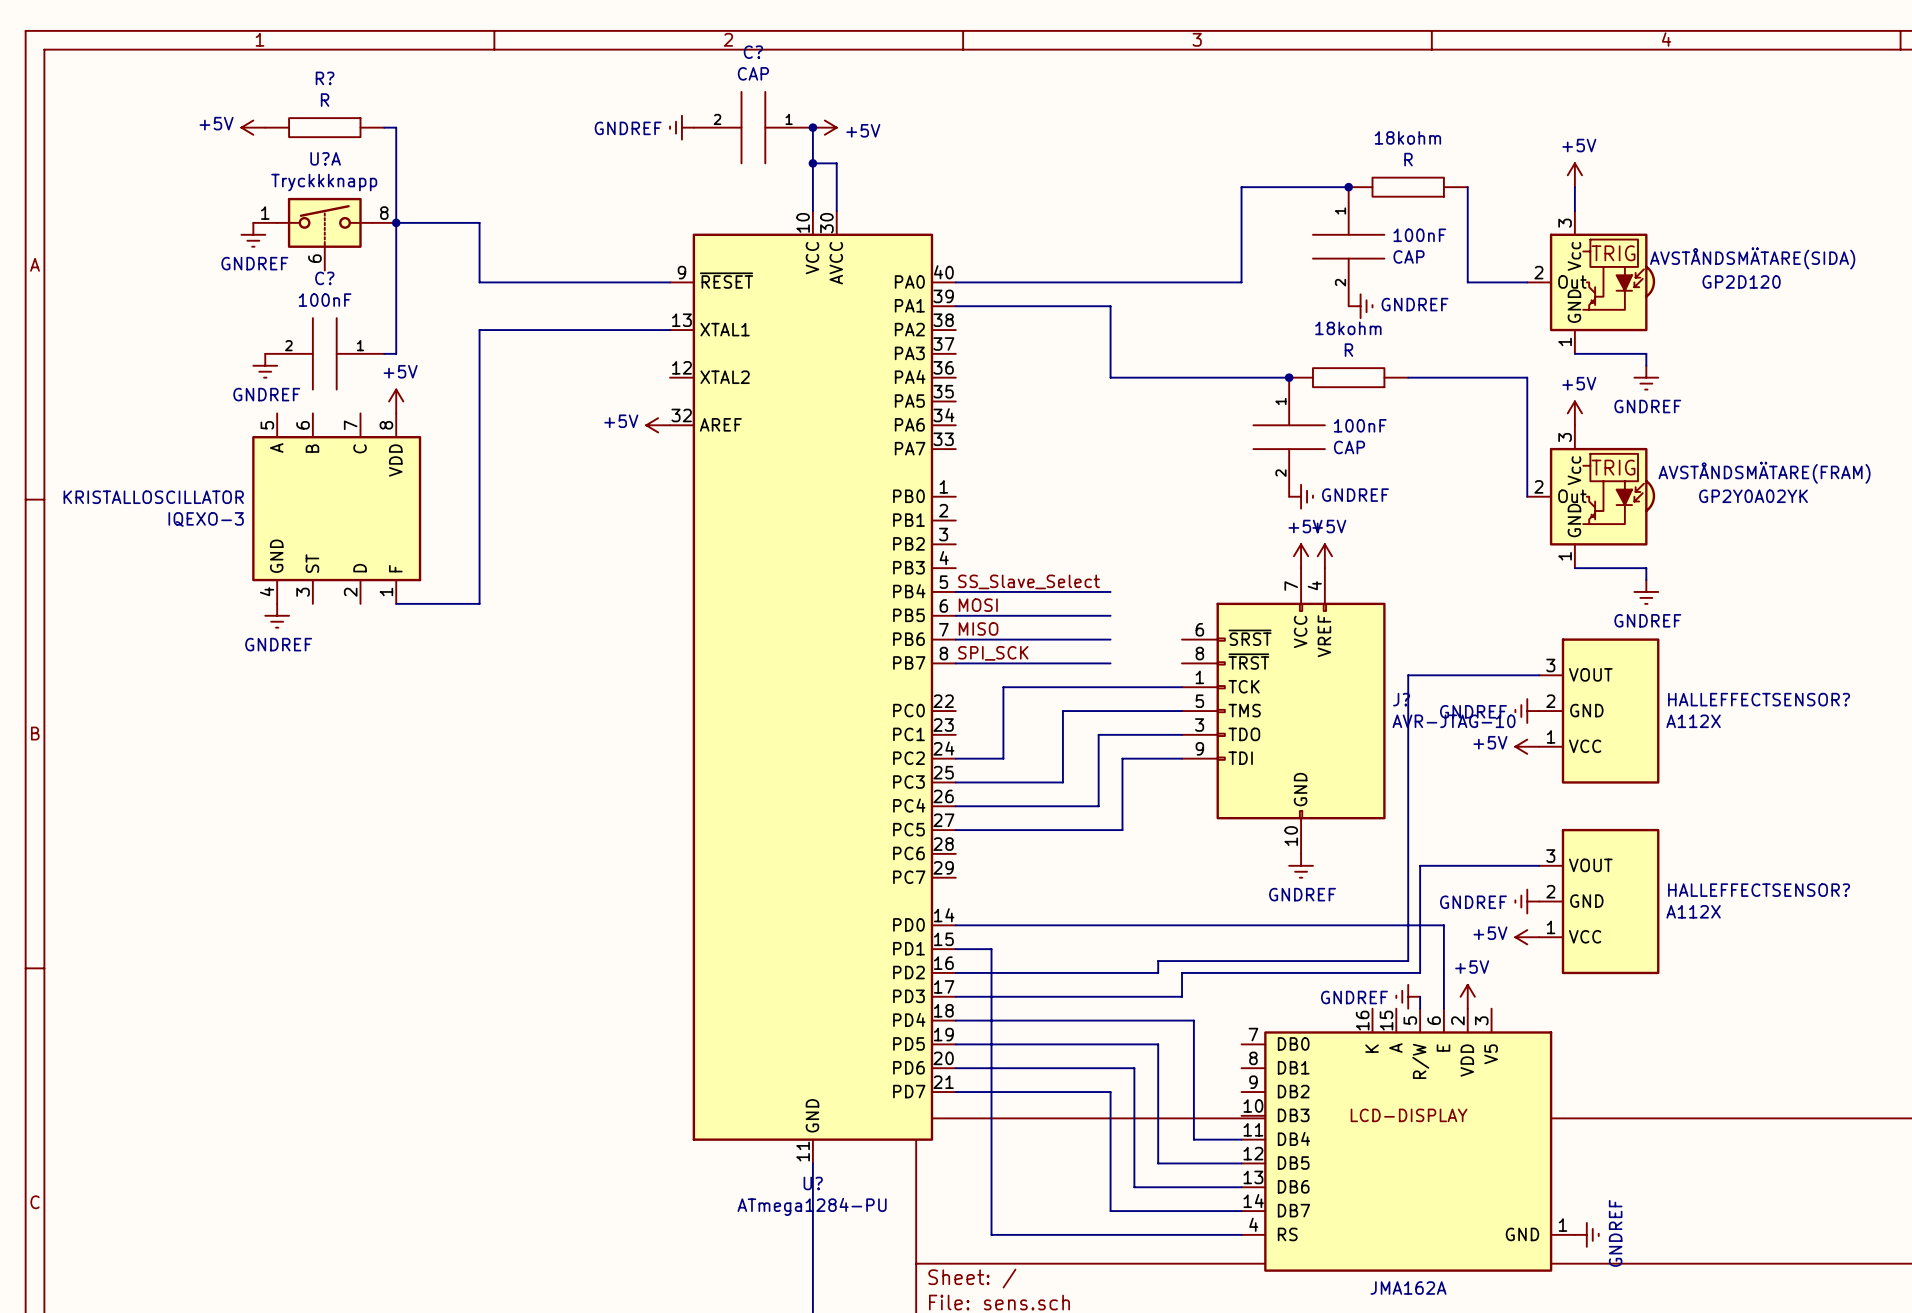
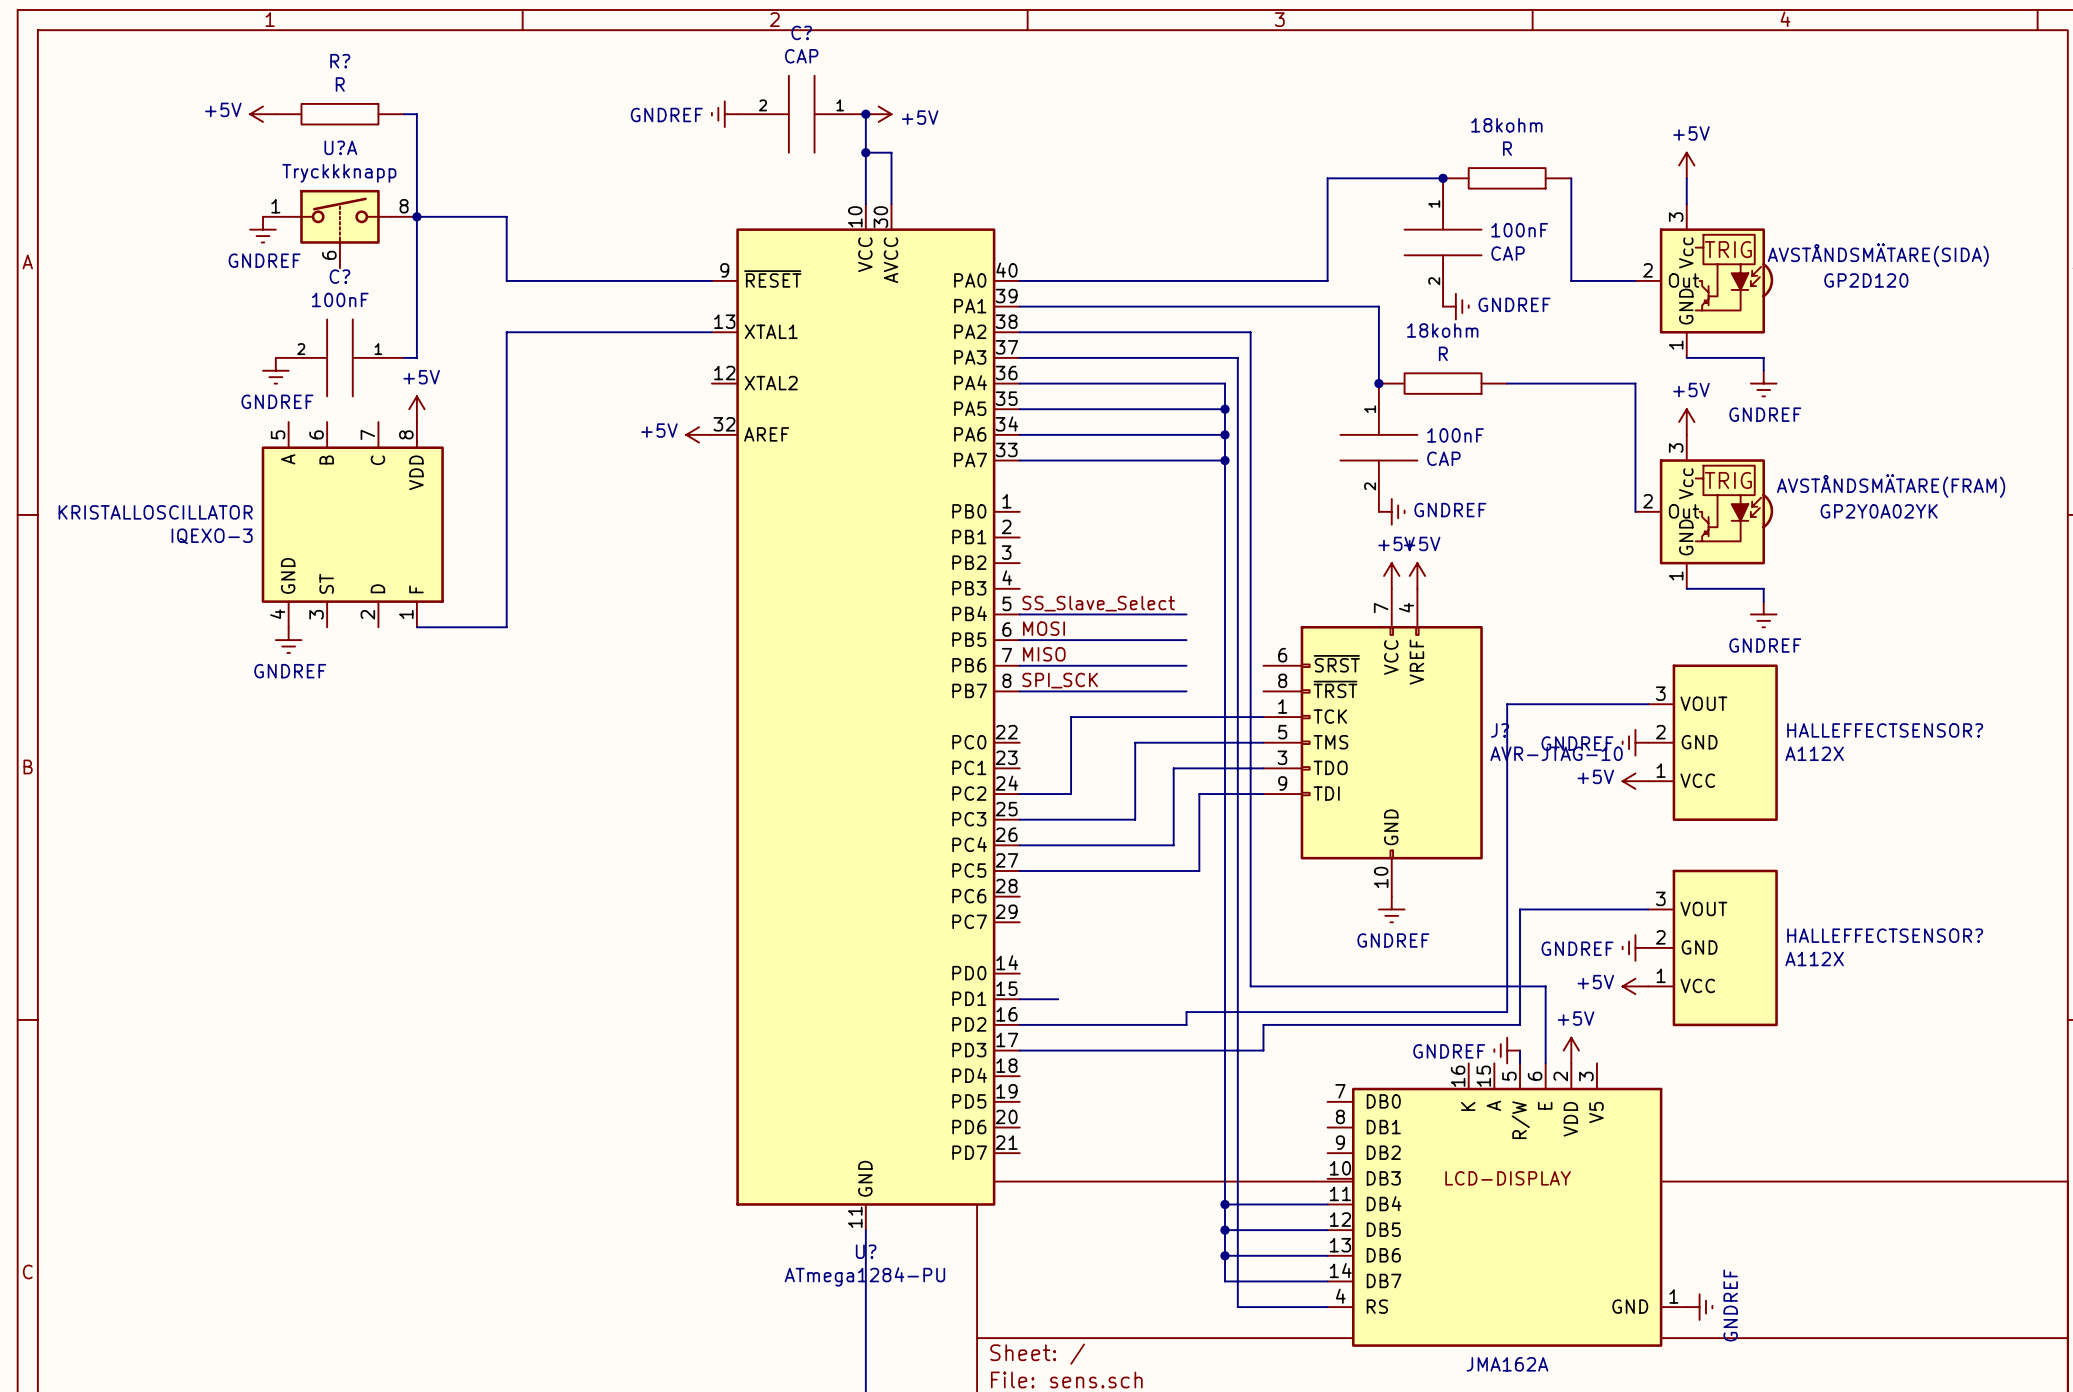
wire: (1110, 306) (1110, 377) -> (1019, 383) (1186, 383)
wire: none -> (1019, 357) (1237, 357) (1237, 1012) (1186, 1012) (1186, 1024)
wire: (1146, 377) (1289, 377) -> (1186, 306) (1378, 306) (1378, 383)
wire: none -> (1019, 409) (1224, 409)
junction: none -> (1224, 409)
wire: none -> (1019, 434) (1224, 434)
junction: none -> (1224, 434)
wire: none -> (1019, 460) (1224, 460)
junction: none -> (1224, 460)
wire: (955, 925) (1443, 925) (1443, 937) -> (1019, 332) (1250, 332) (1250, 986) (1545, 986)
wire: (991, 949) (991, 1234) (1158, 1234) -> (1224, 1230) (1237, 1230) (1237, 1307)
wire: (1110, 972) (1158, 972) -> (1237, 1101) (1237, 1024)
wire: (955, 1020) (1193, 1020) (1193, 1139) -> (1224, 1204) (1276, 1204)
wire: (955, 1044) (1158, 1044) -> none
wire: (955, 1068) (1134, 1068) (1134, 1187) (1146, 1187) -> none
wire: (955, 1092) (1110, 1092) (1110, 1211) (1146, 1211) -> (1224, 383) (1224, 1281)
junction: none -> (1224, 1204)
junction: none -> (1224, 1230)
junction: none -> (1224, 1255)

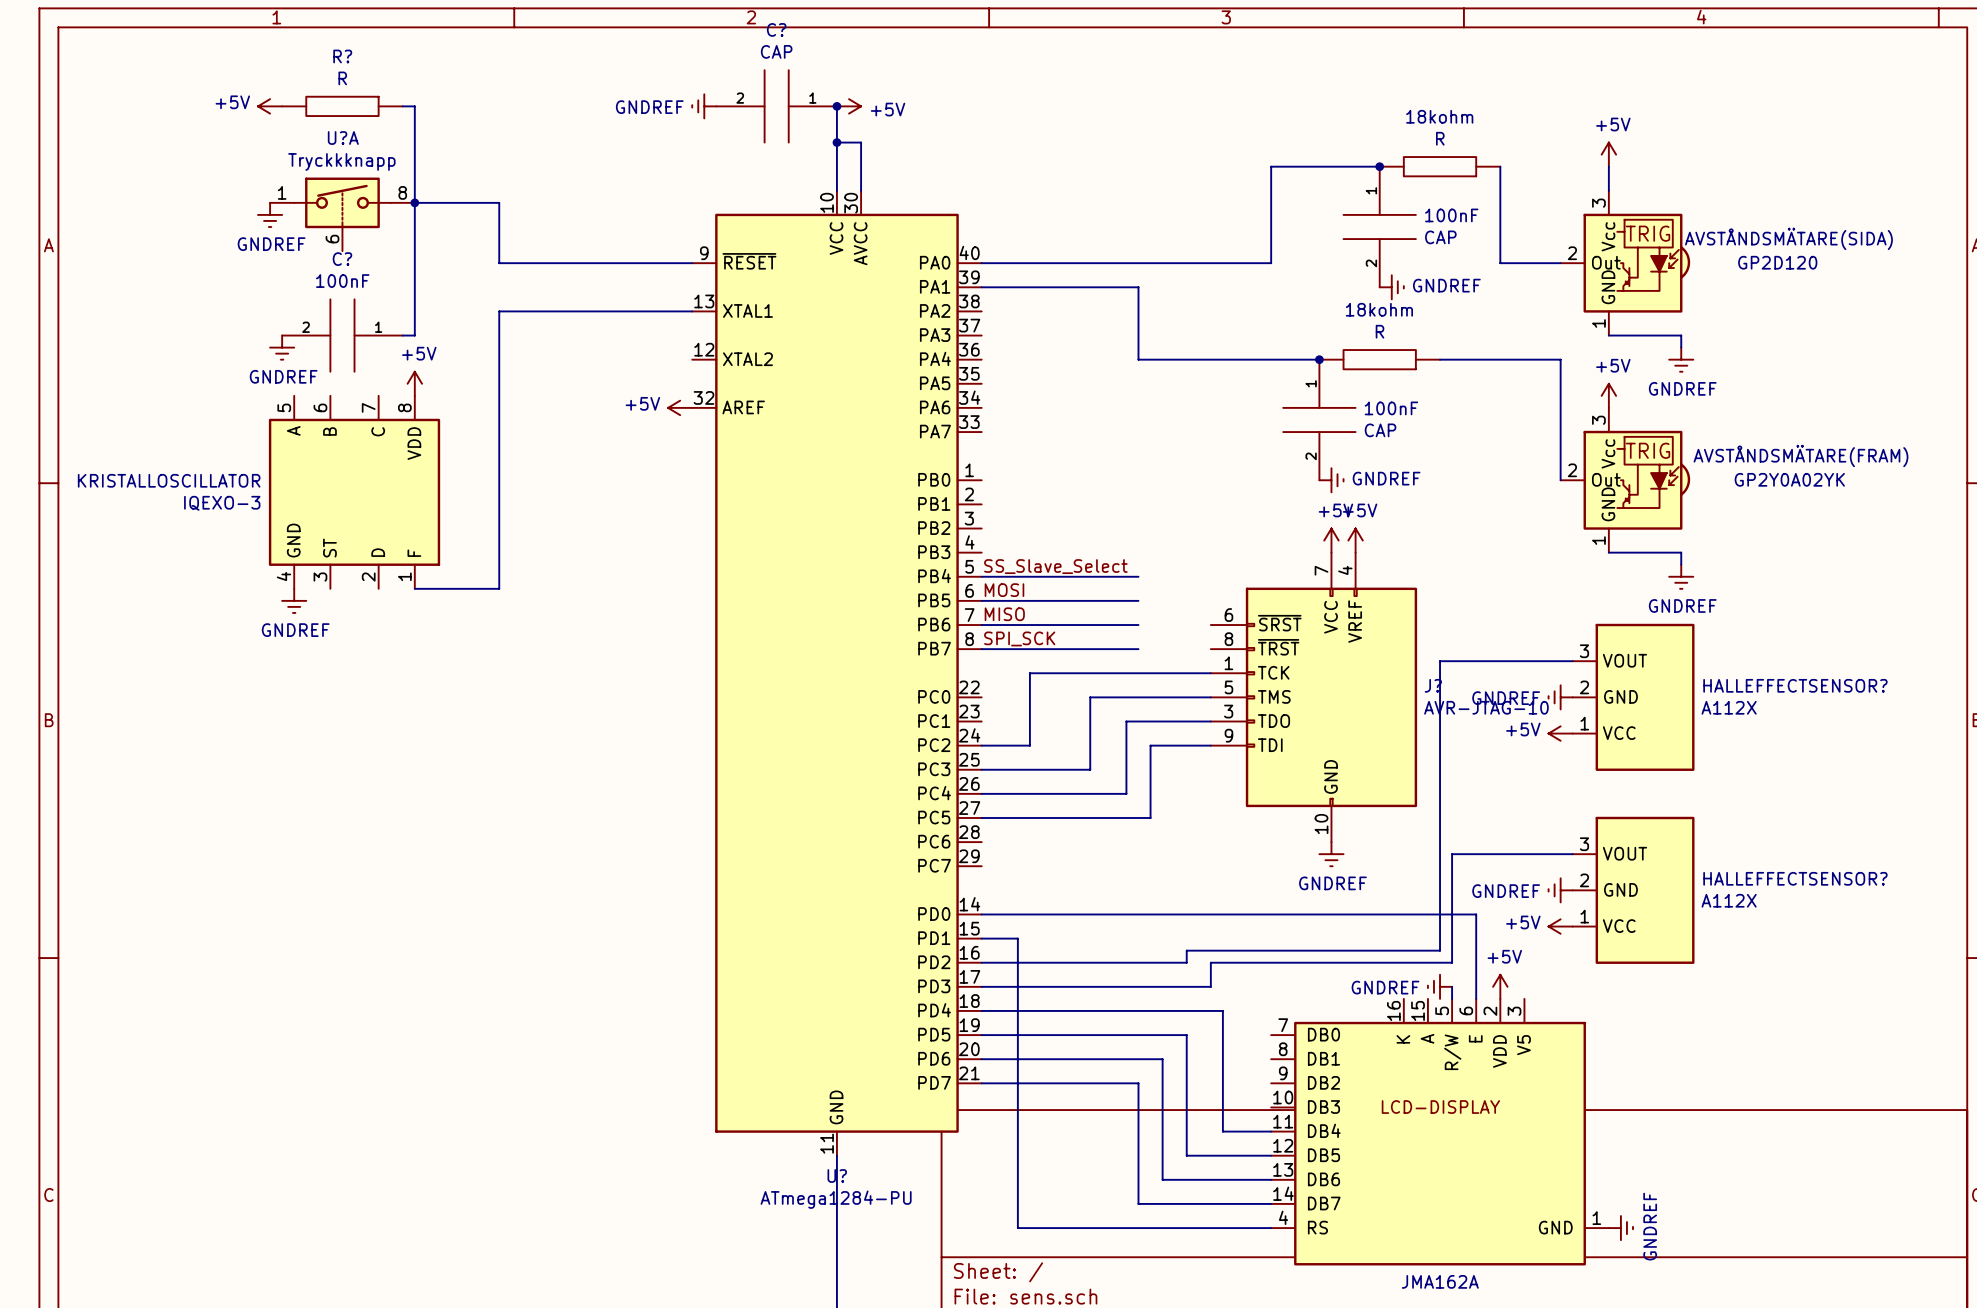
wire: (1186, 306) (1378, 306) (1378, 383) -> (1174, 359) (1319, 359)
wire: (1019, 332) (1250, 332) (1250, 986) (1545, 986) -> (981, 914) (1476, 914) (1476, 926)
wire: (1019, 357) (1237, 357) (1237, 1012) (1186, 1012) (1186, 1024) -> none
wire: (1019, 383) (1186, 383) -> (1138, 287) (1138, 359)
wire: (1224, 383) (1224, 1281) -> (981, 1083) (1138, 1083) (1138, 1203) (1174, 1203)
wire: (1019, 409) (1224, 409) -> none
junction: (1224, 409) -> none
wire: (1019, 434) (1224, 434) -> none
junction: (1224, 434) -> none
wire: (1019, 460) (1224, 460) -> none
junction: (1224, 460) -> none
wire: (1237, 1024) (1237, 1101) -> (1186, 962) (1138, 962)
wire: none -> (981, 1035) (1186, 1035)
wire: none -> (981, 1059) (1162, 1059) (1162, 1179) (1174, 1179)
wire: (1224, 1204) (1276, 1204) -> (981, 1010) (1222, 1010) (1222, 1131)
junction: (1224, 1204) -> none
wire: (1224, 1230) (1237, 1230) (1237, 1307) -> (1017, 938) (1017, 1228) (1186, 1228)
junction: (1224, 1230) -> none
junction: (1224, 1255) -> none

